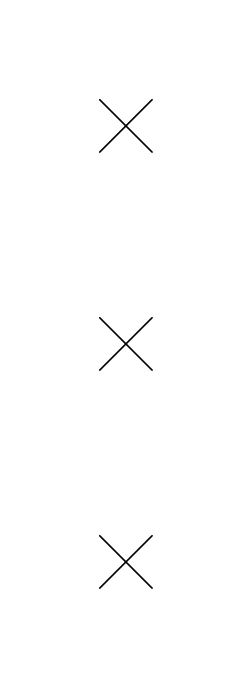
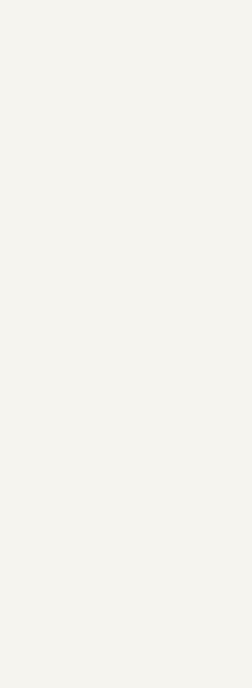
no-connect mark: (125, 125) -> none
no-connect mark: (125, 343) -> none
no-connect mark: (125, 561) -> none

